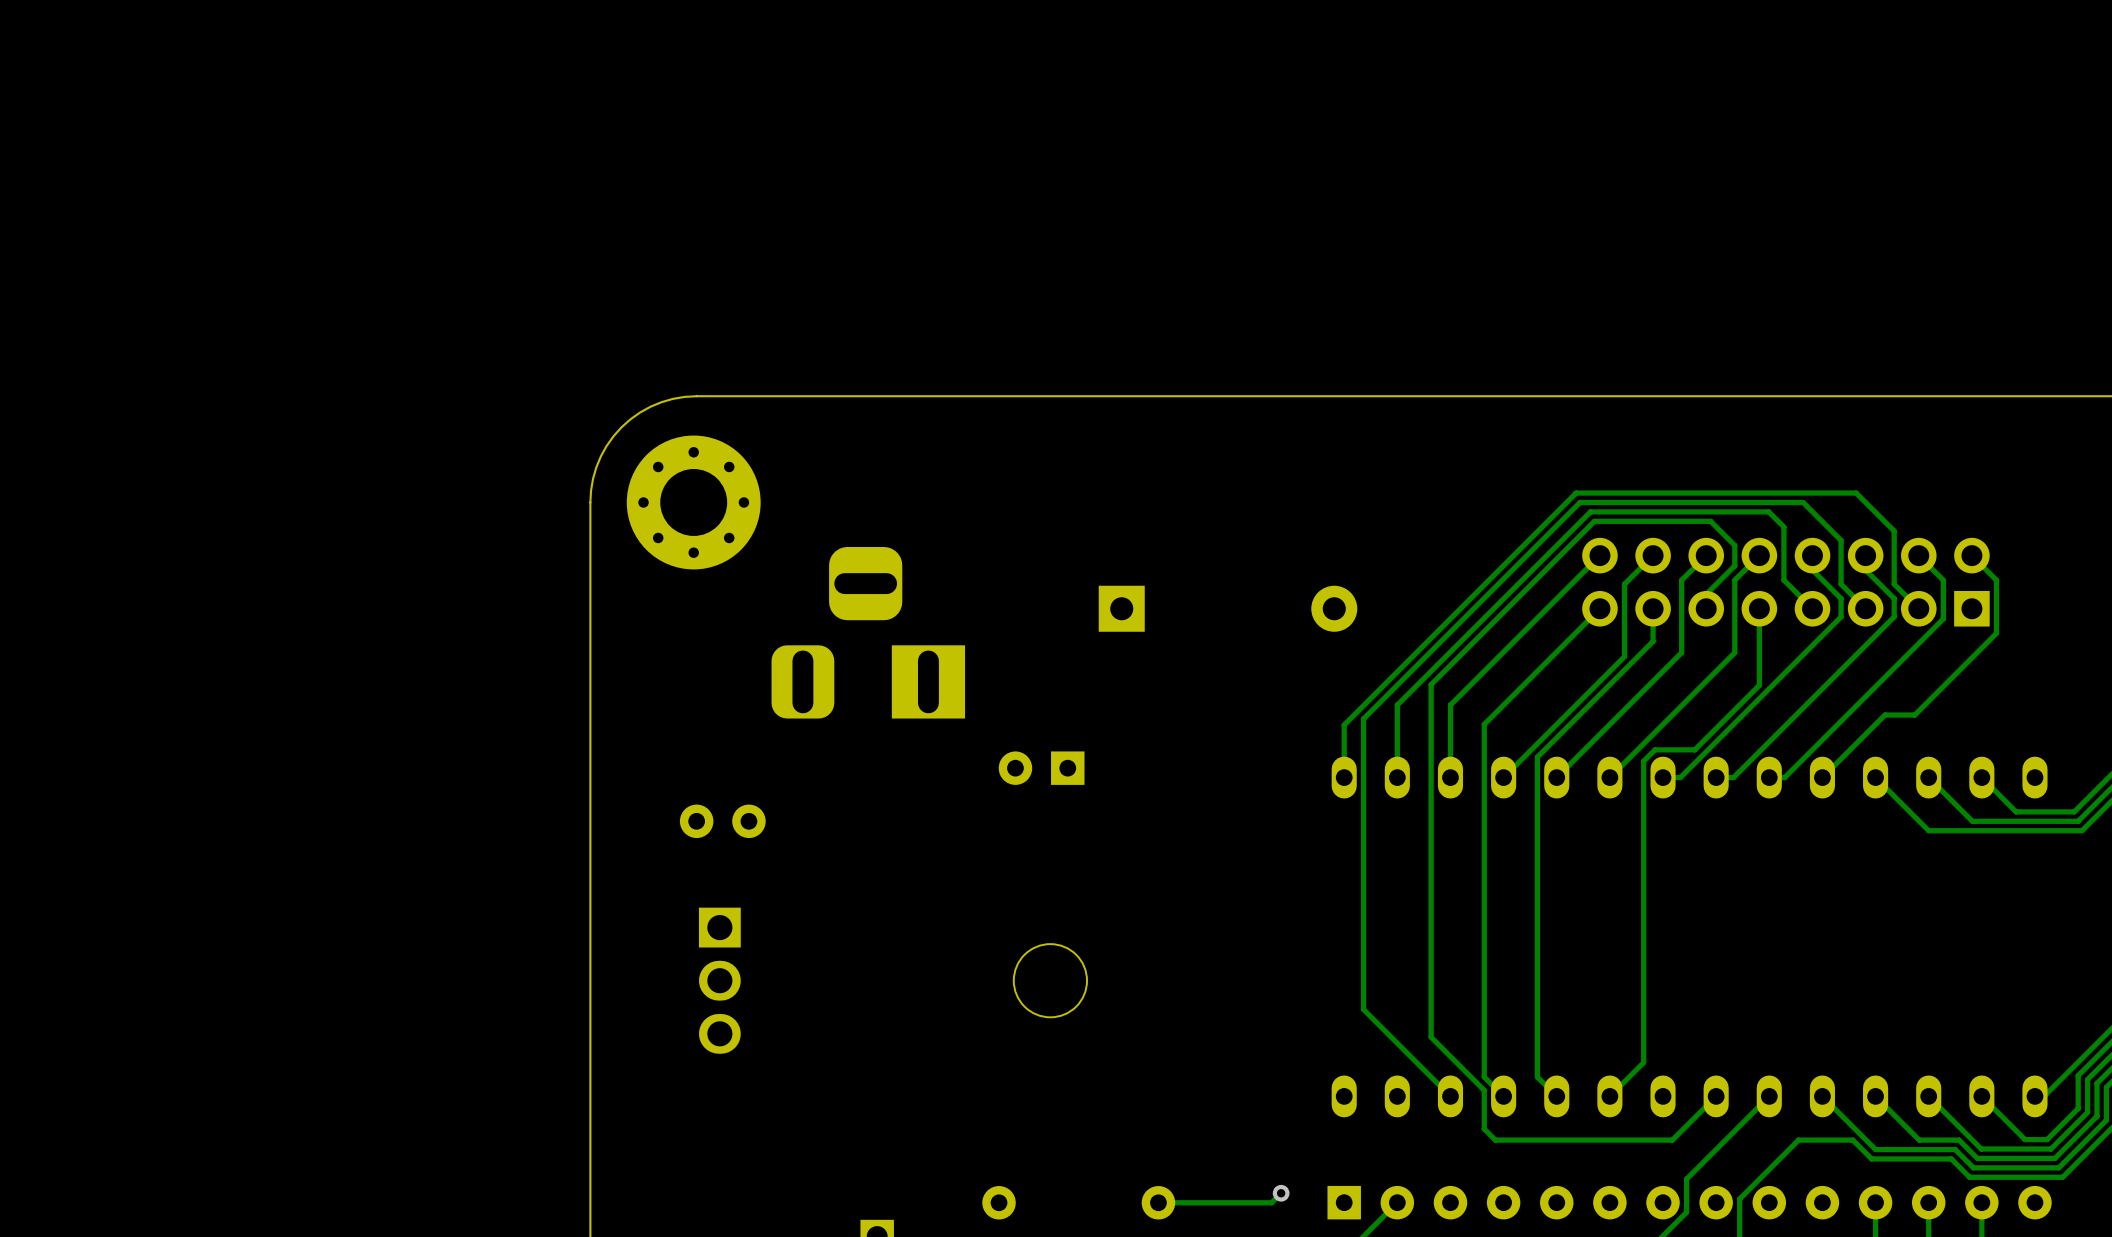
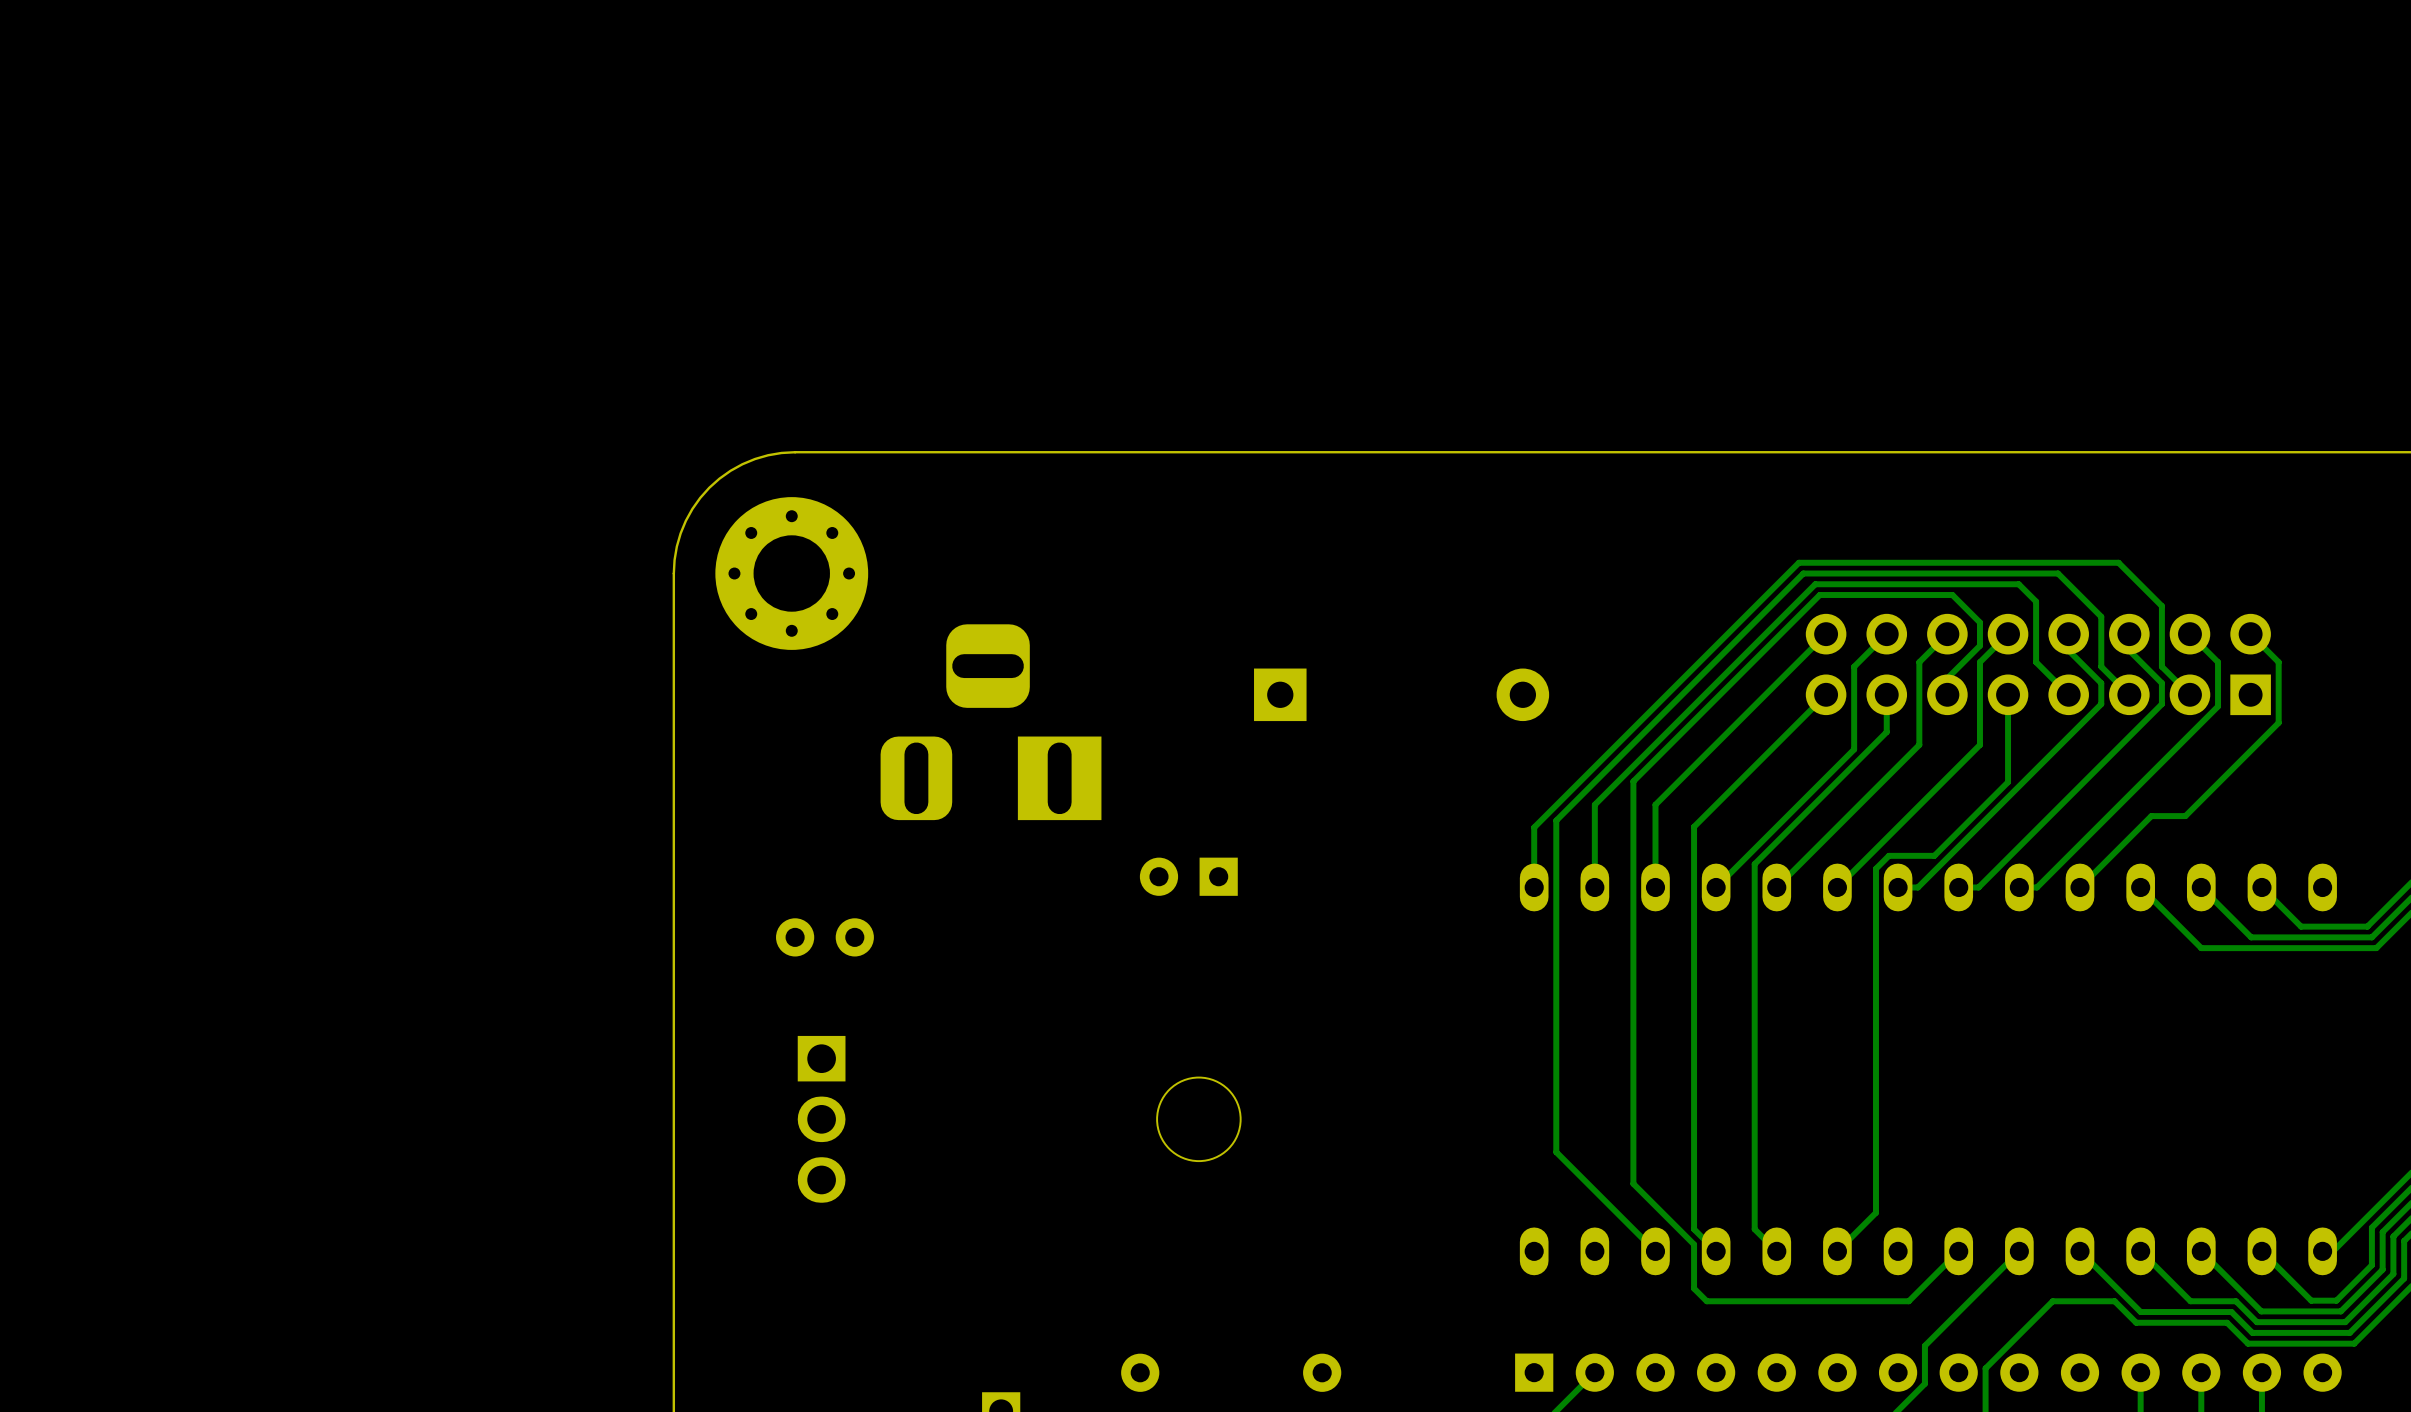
track: (1281, 1193) (1271, 1202) (1158, 1202) -> none
via: (1281, 1193) -> none

